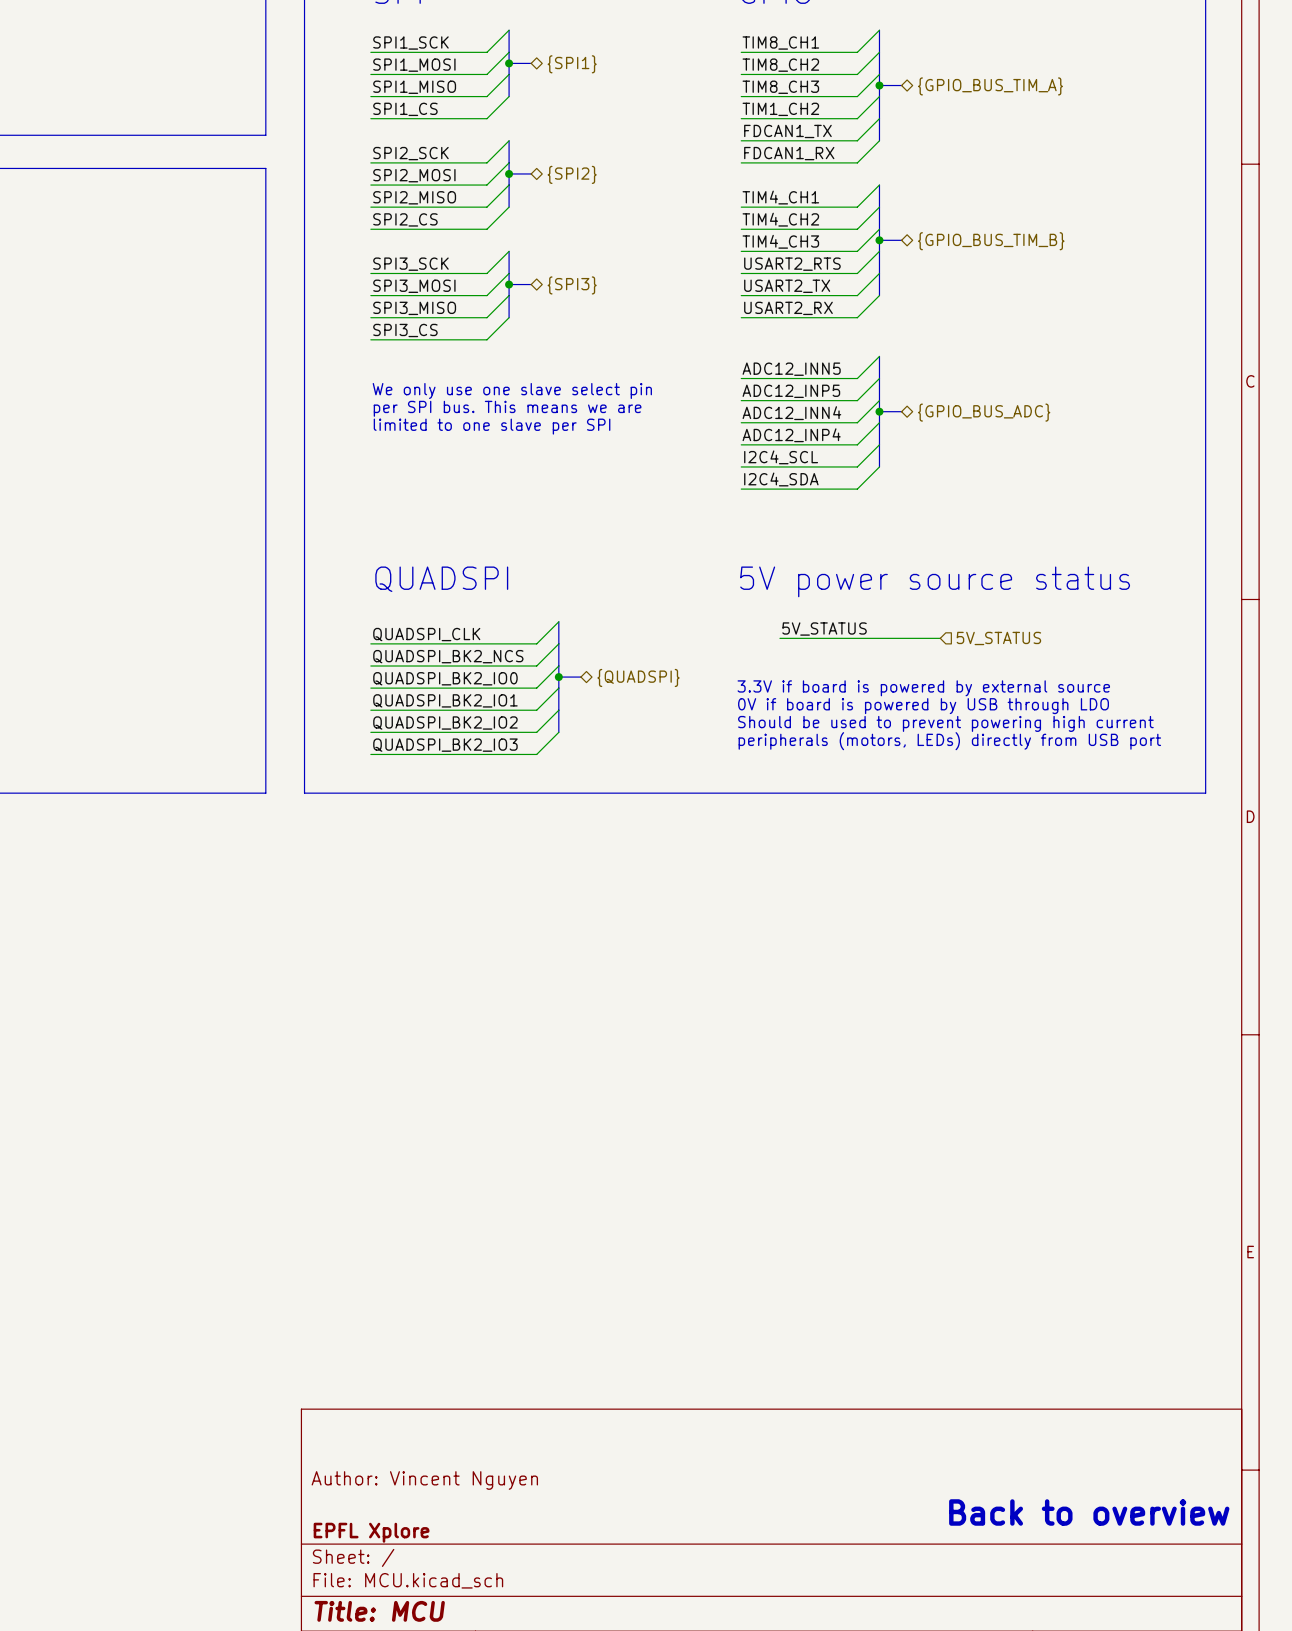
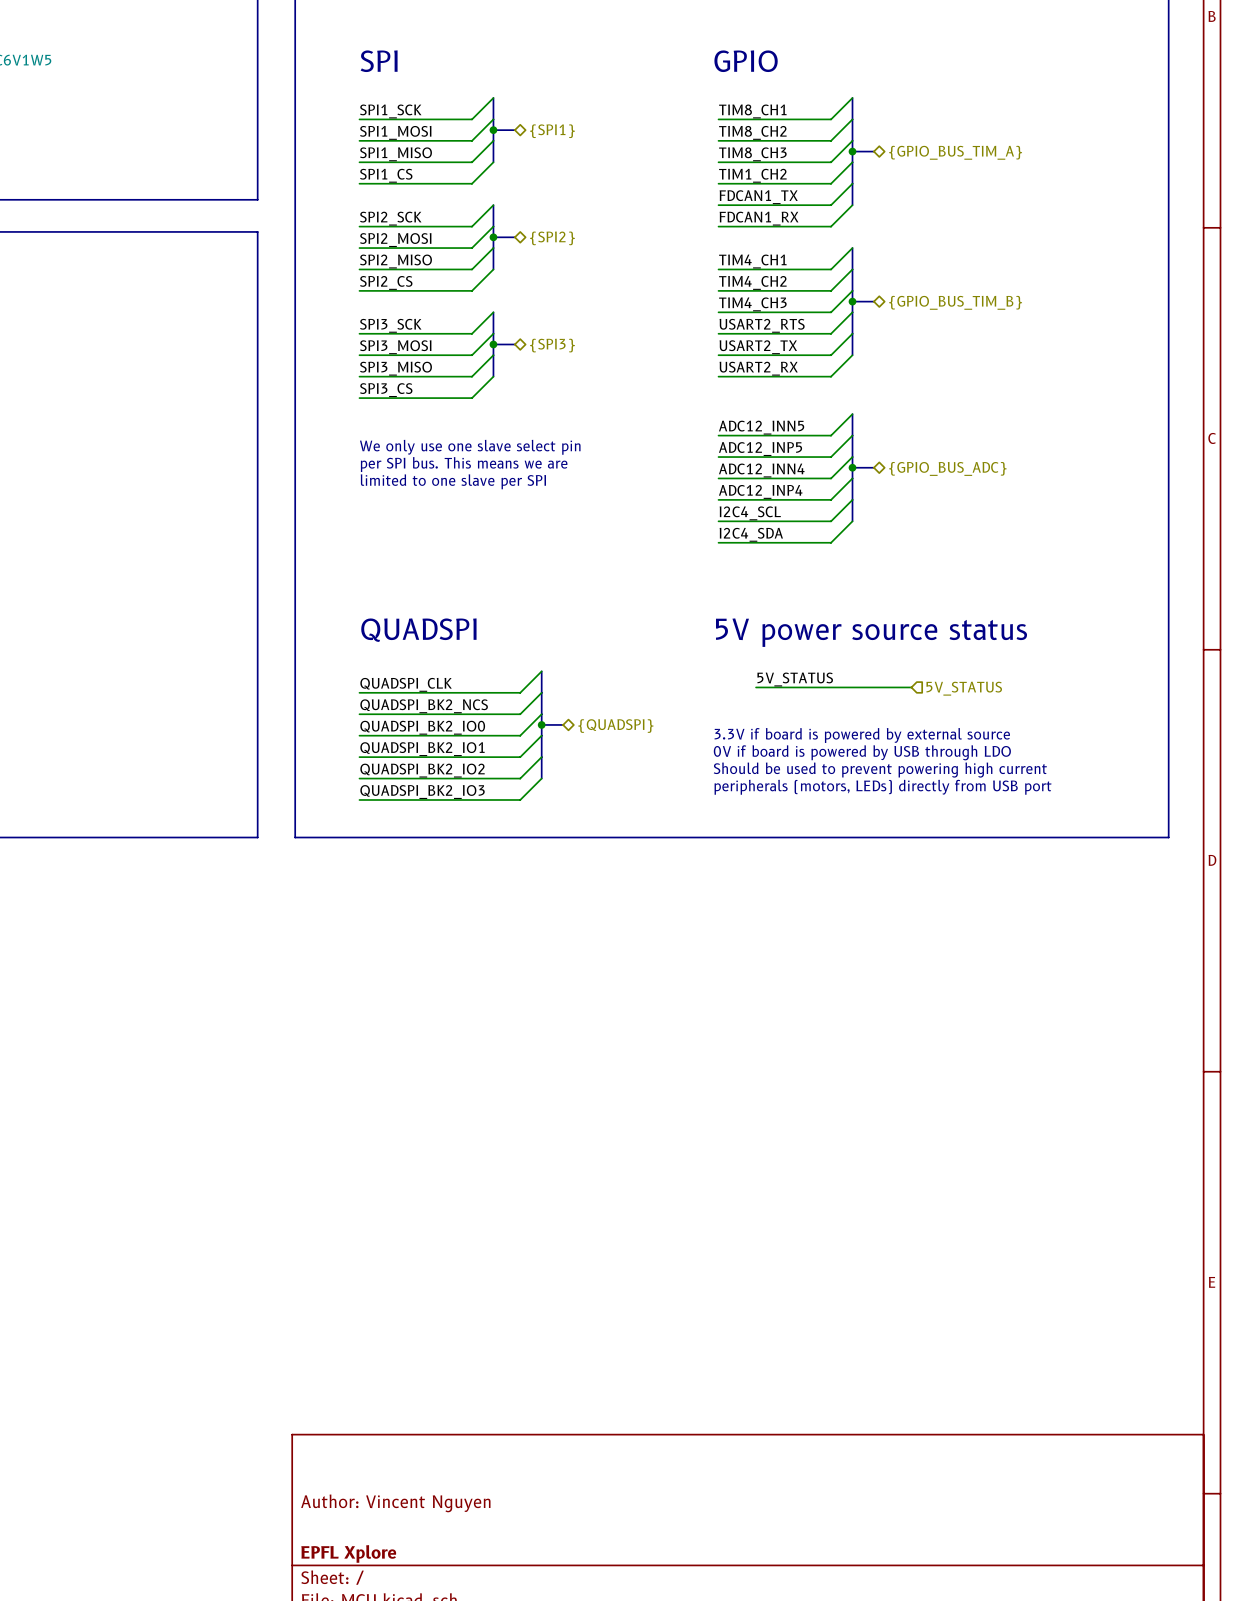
text: Back to overview (1089, 1512) -> none

